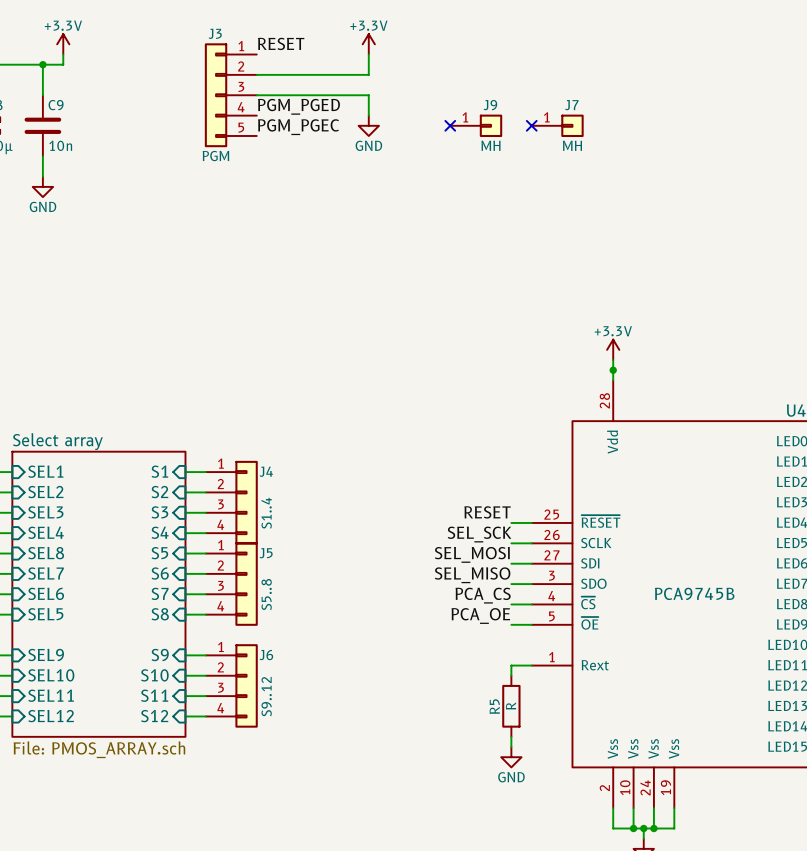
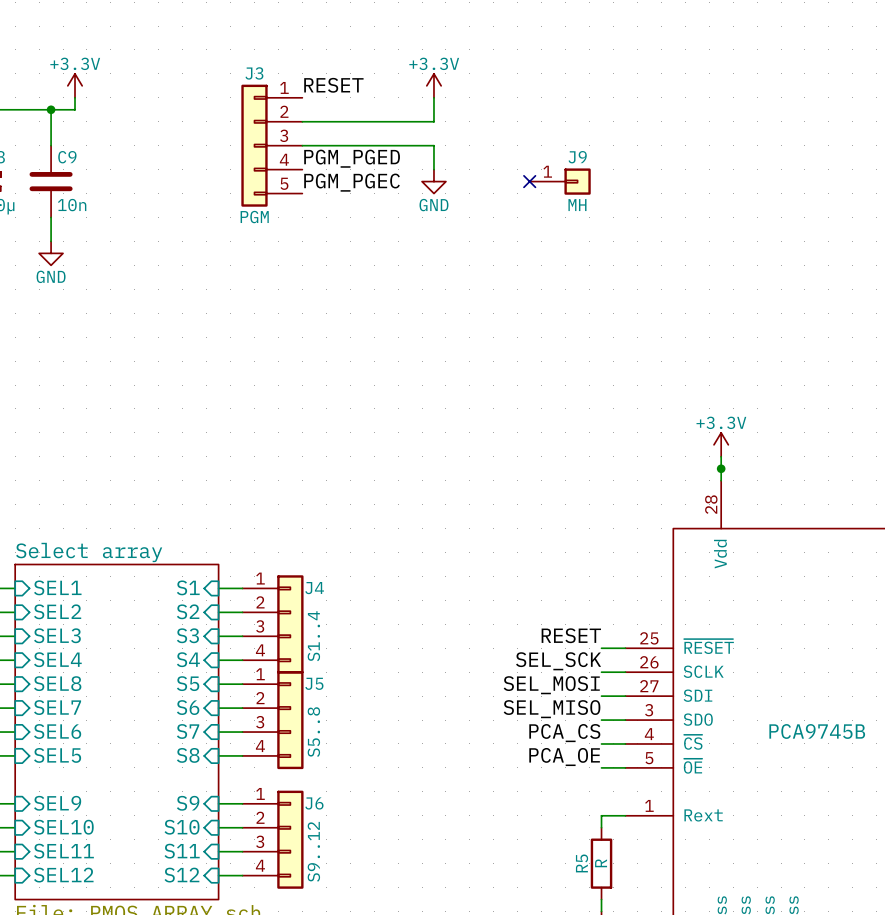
no-connect mark: (531, 125) -> none
J7: MH (557, 125) -> none

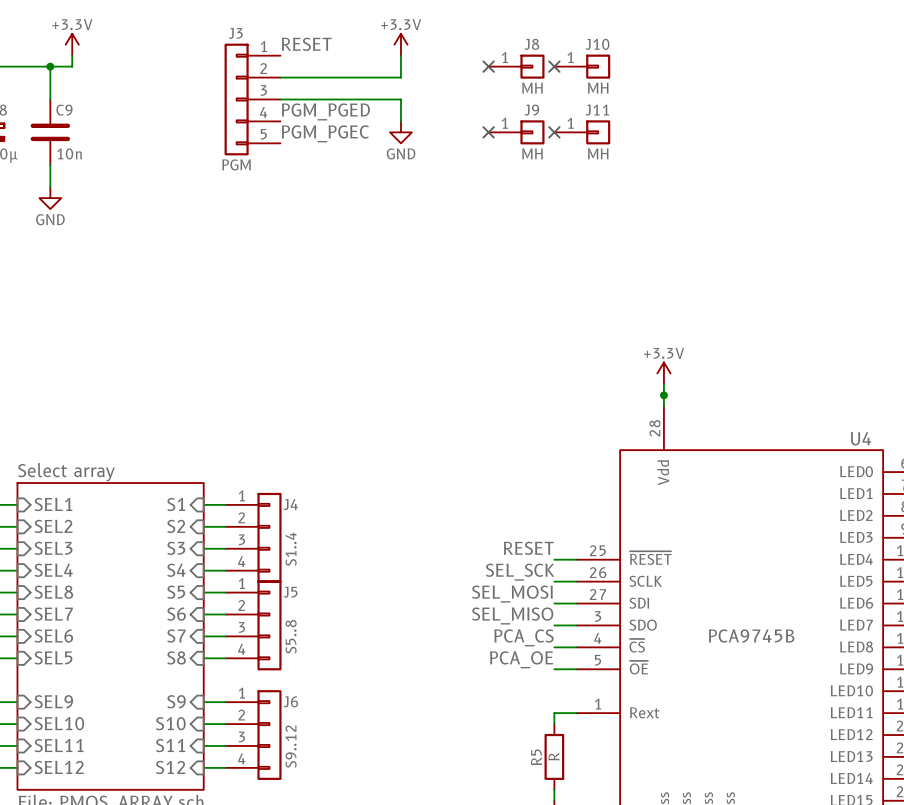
no-connect mark: none -> (488, 66)
J8: none -> MH (516, 66)
no-connect mark: none -> (554, 66)
J10: none -> MH (582, 66)
no-connect mark: none -> (554, 132)
J11: none -> MH (582, 132)

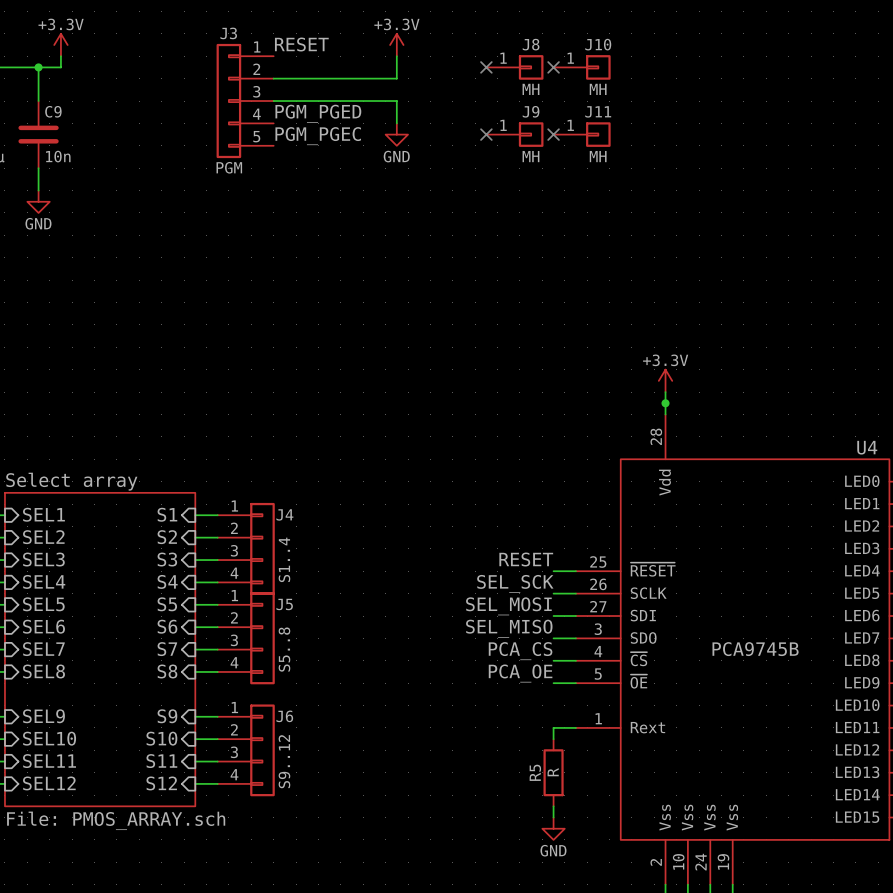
sheet pin: SEL8 (53, 592) -> SEL5 (43, 604)
sheet pin: SEL7 (53, 614) -> SEL6 (43, 626)
sheet pin: SEL6 (53, 635) -> SEL7 (43, 649)
sheet pin: SEL5 (53, 657) -> SEL8 (43, 671)

